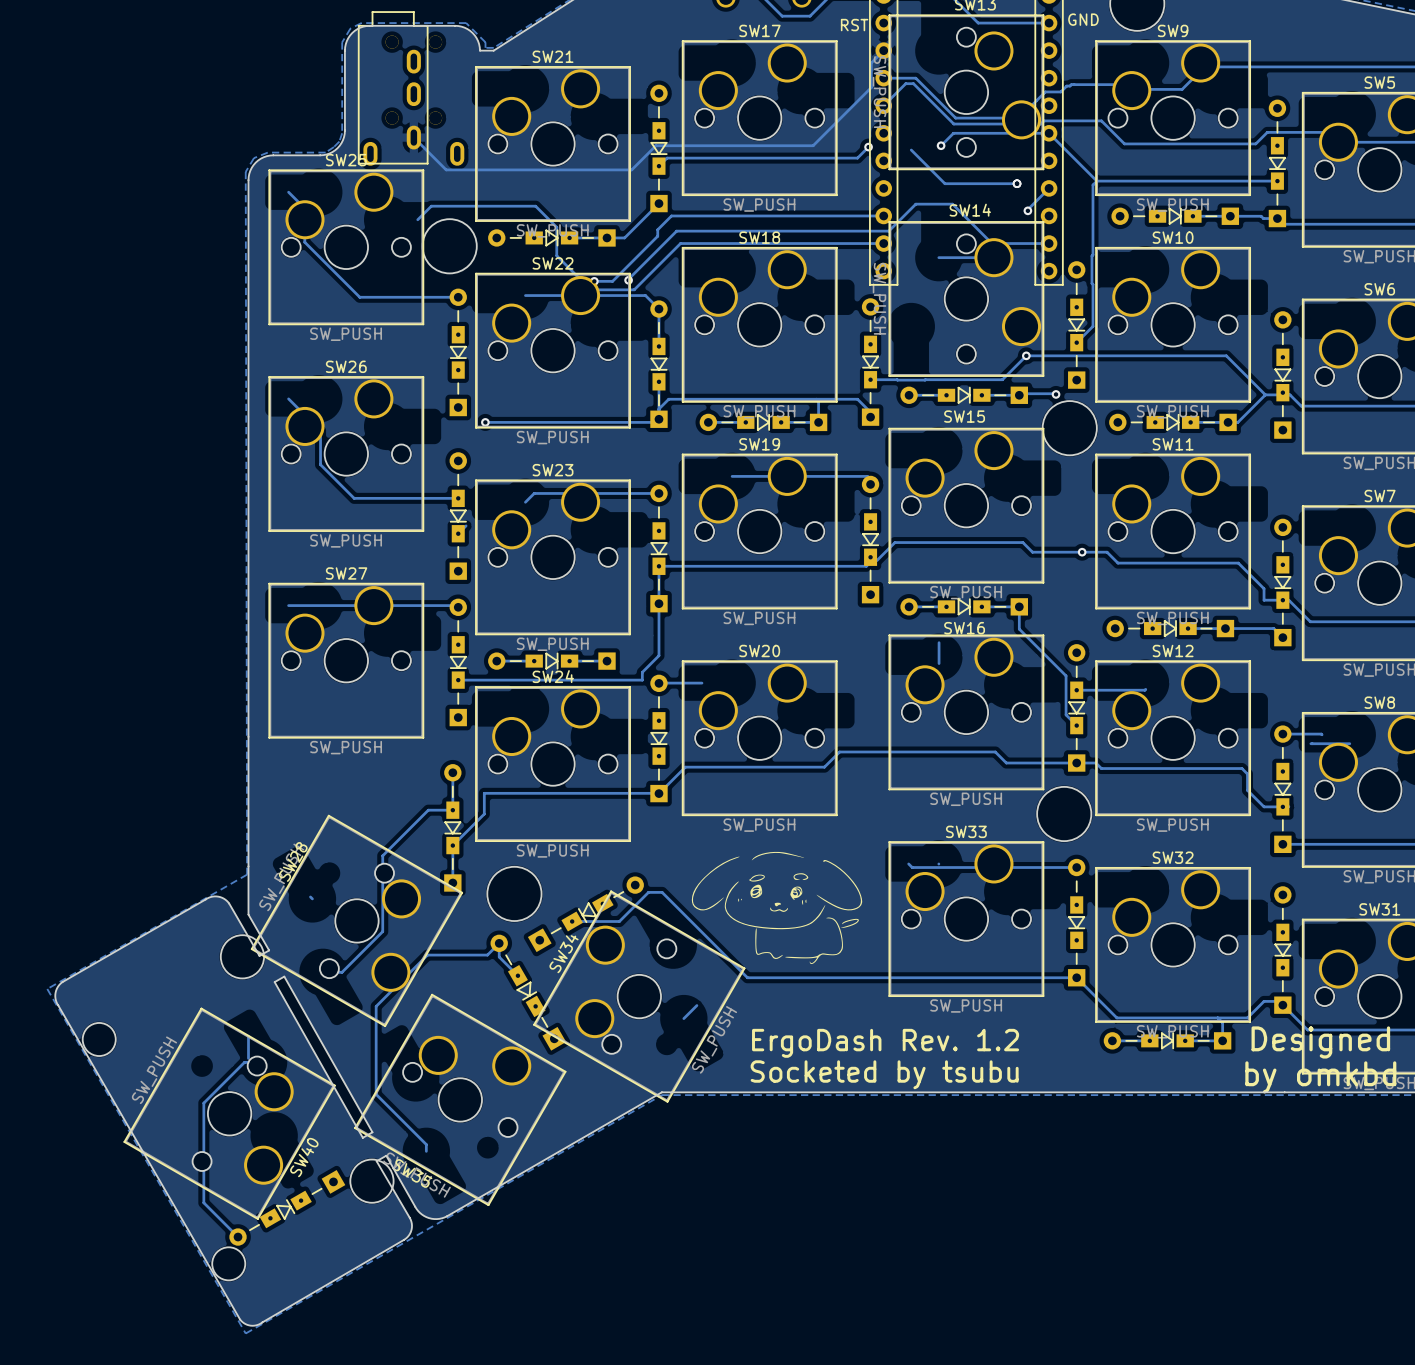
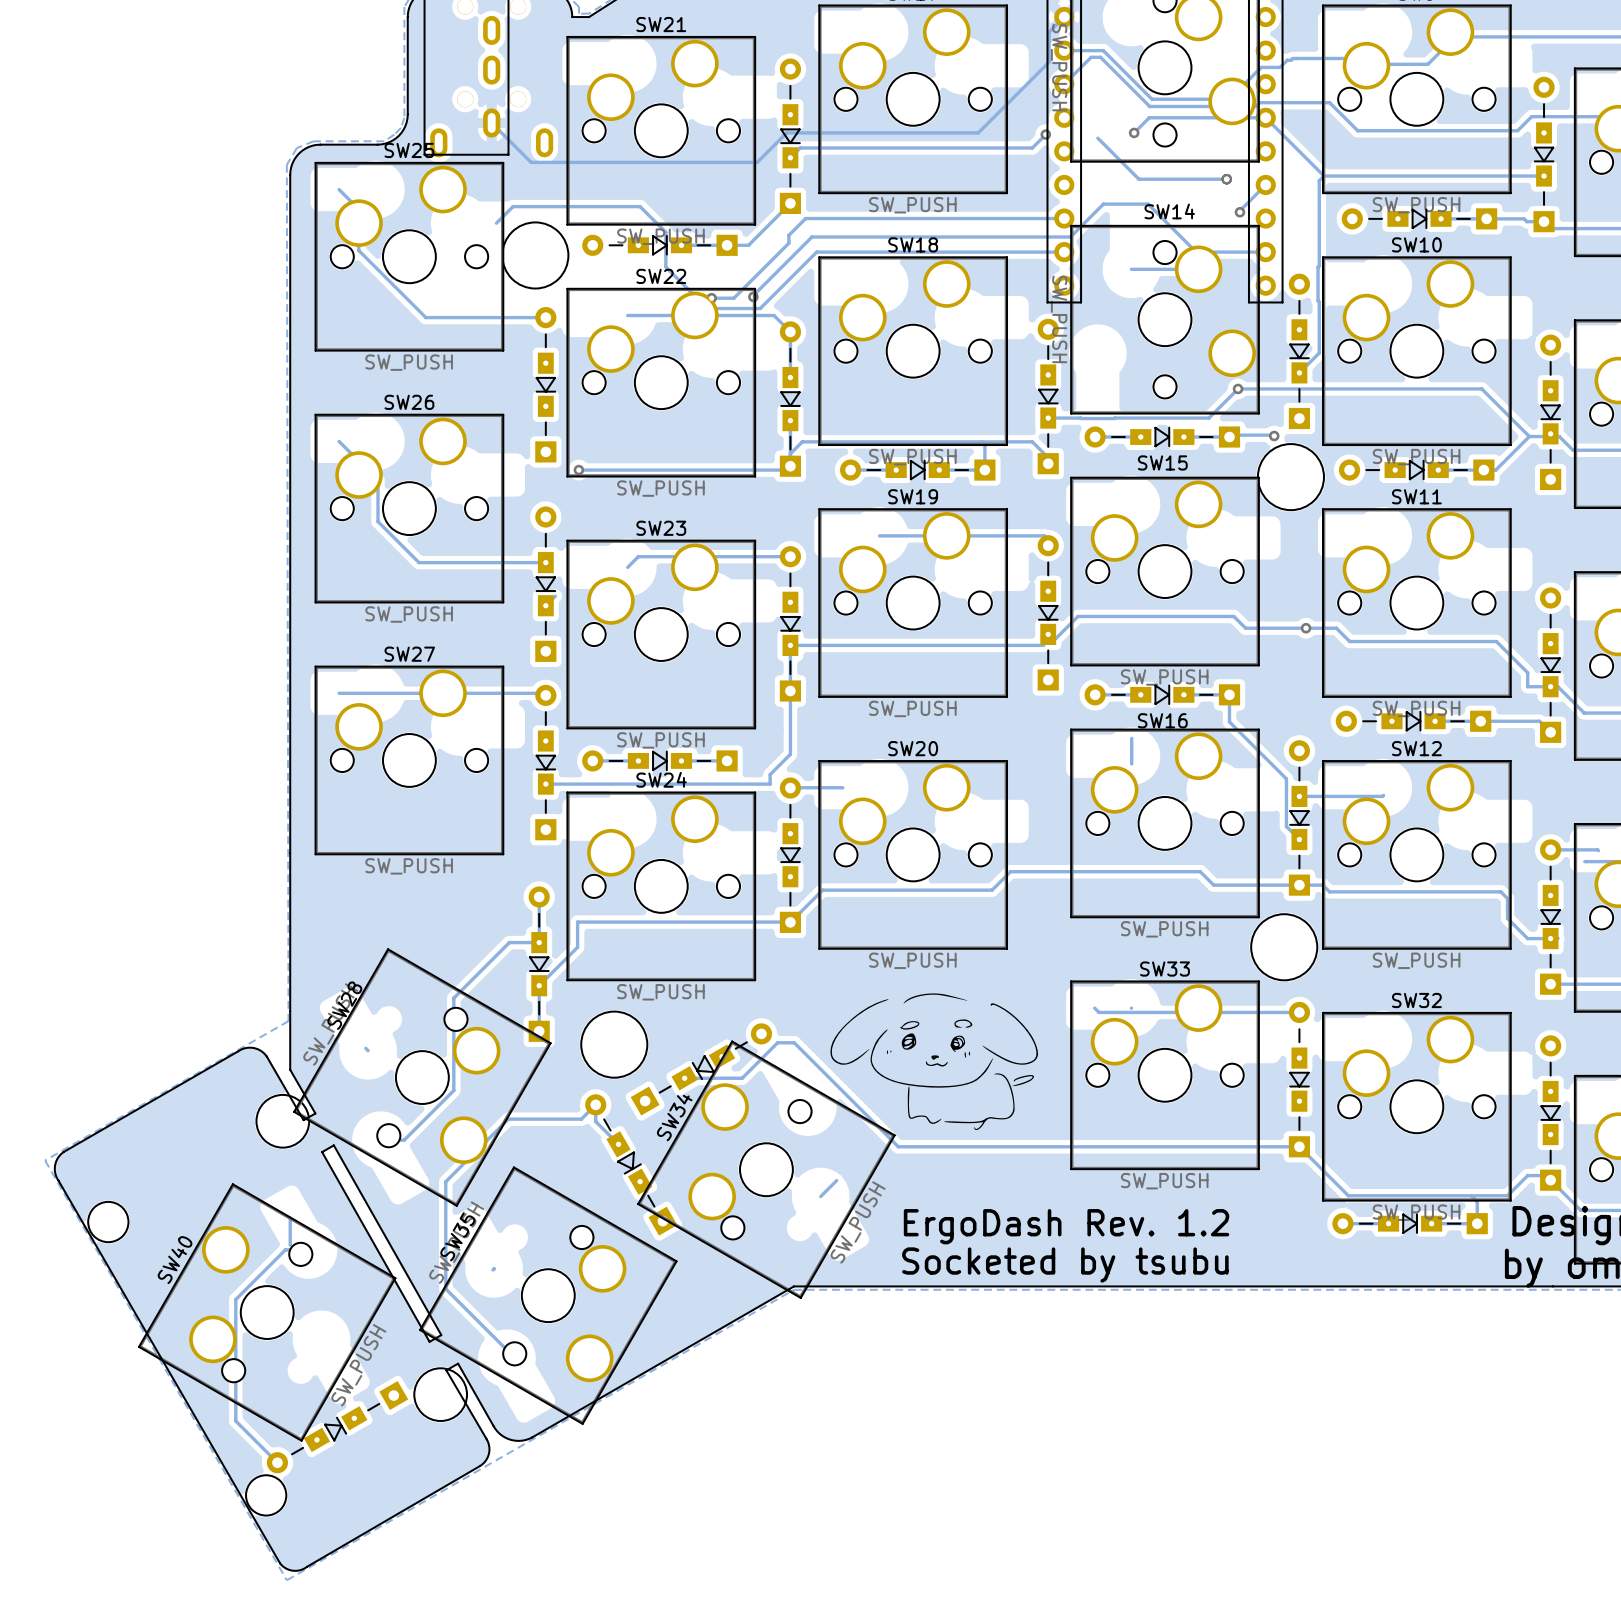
SW35 rotation: 0° (460, 1099) -> 90° clockwise (548, 1295)
SW40 rotation: 0° (229, 1113) -> 180° (267, 1312)

